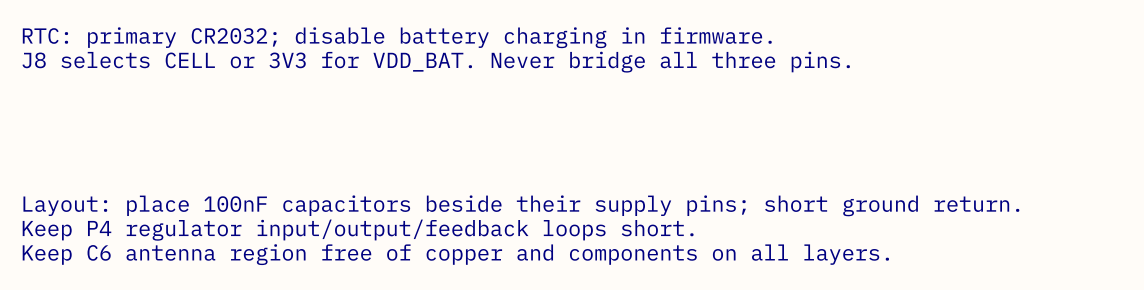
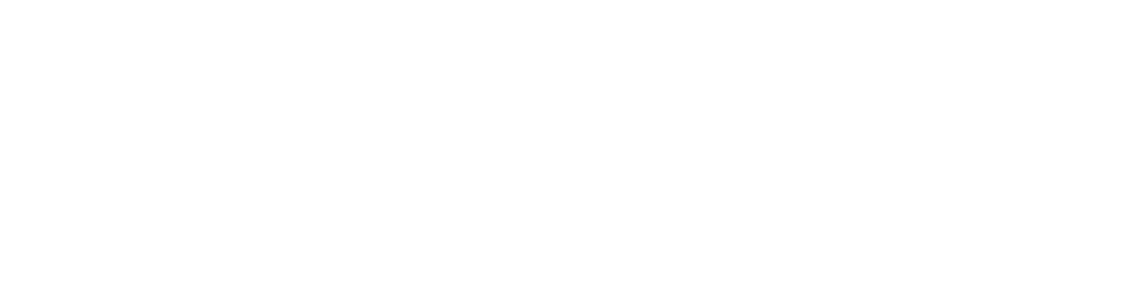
text: RTC: primary CR2032; disable battery charging in firmware. (397, 37) -> none
text: J8 selects CELL or 3V3 for VDD_BAT. Never bridge all three pins. (436, 62) -> none
text: Layout: place 100nF capacitors beside their supply pins; short ground return. (521, 205) -> none
text: Keep P4 regulator input/output/feedback loops short. (358, 230) -> none
text: Keep C6 antenna region free of copper and components on all layers. (455, 254) -> none

